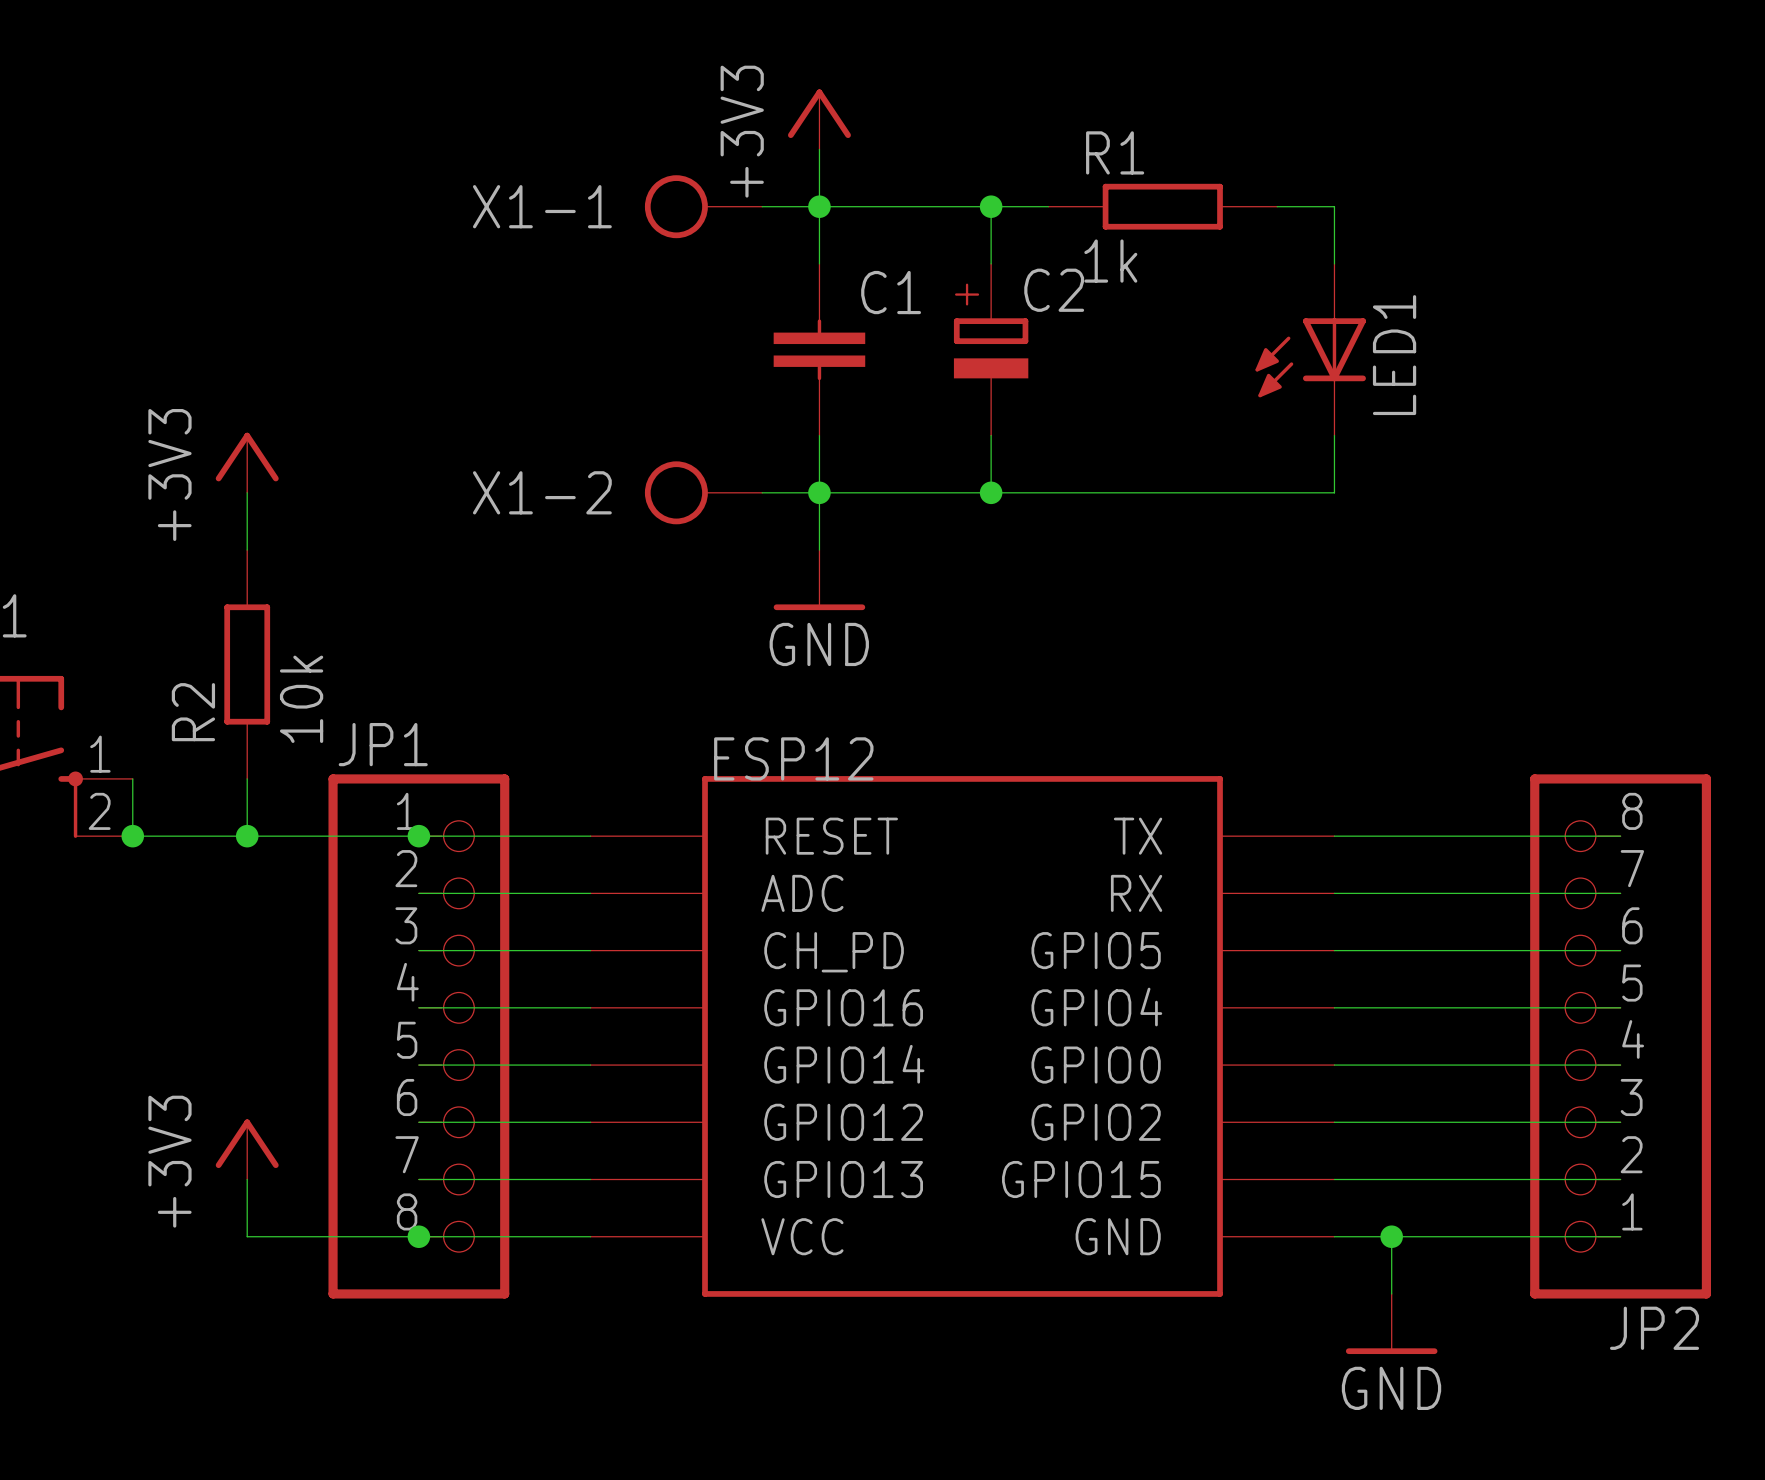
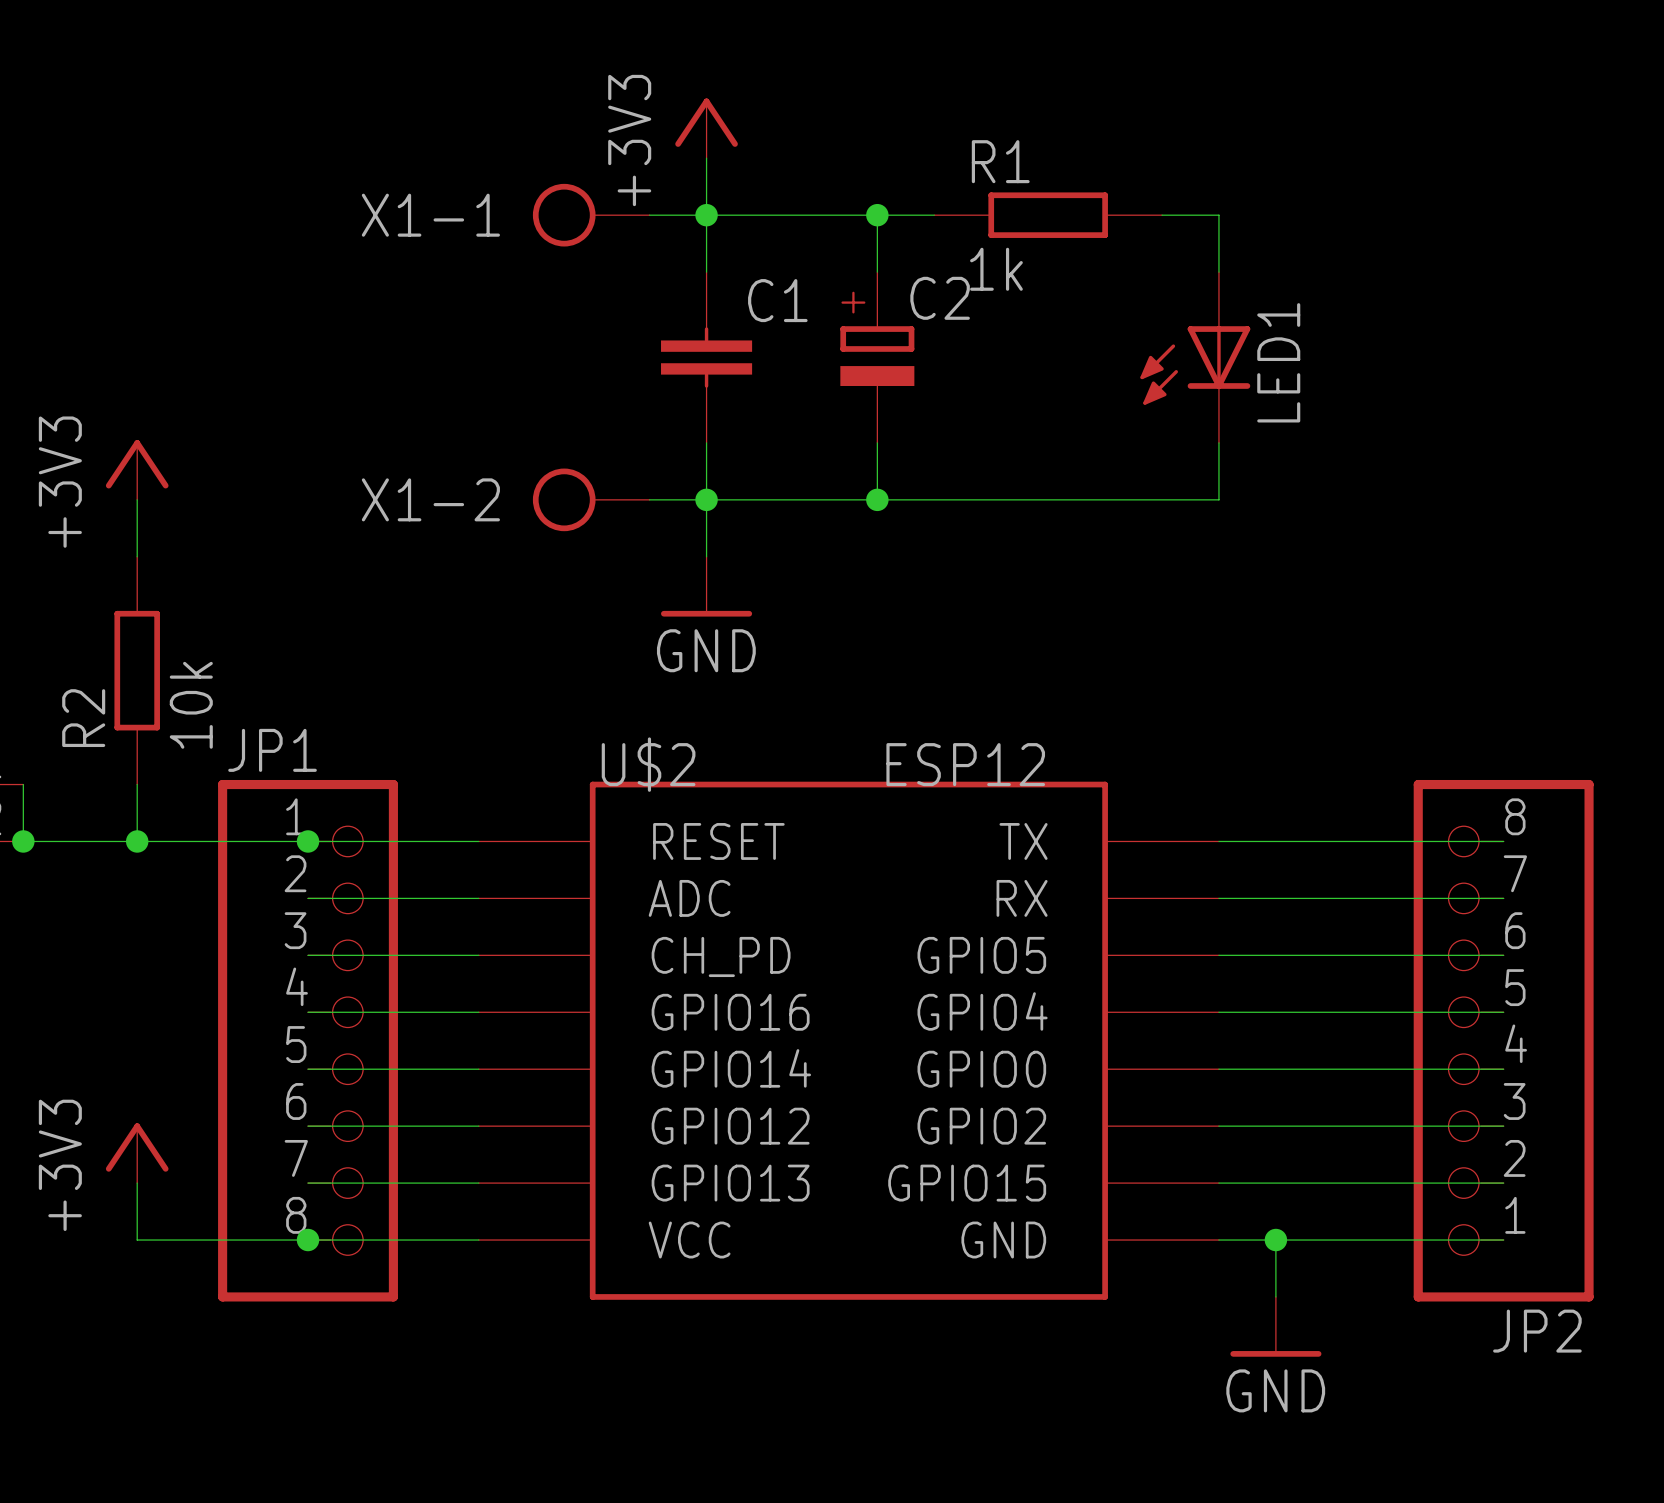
U$2 name: none -> U$2 (648, 764)
U$2 text: ESP12 (793, 758) -> none
U$2 value: none -> ESP12 (965, 764)

